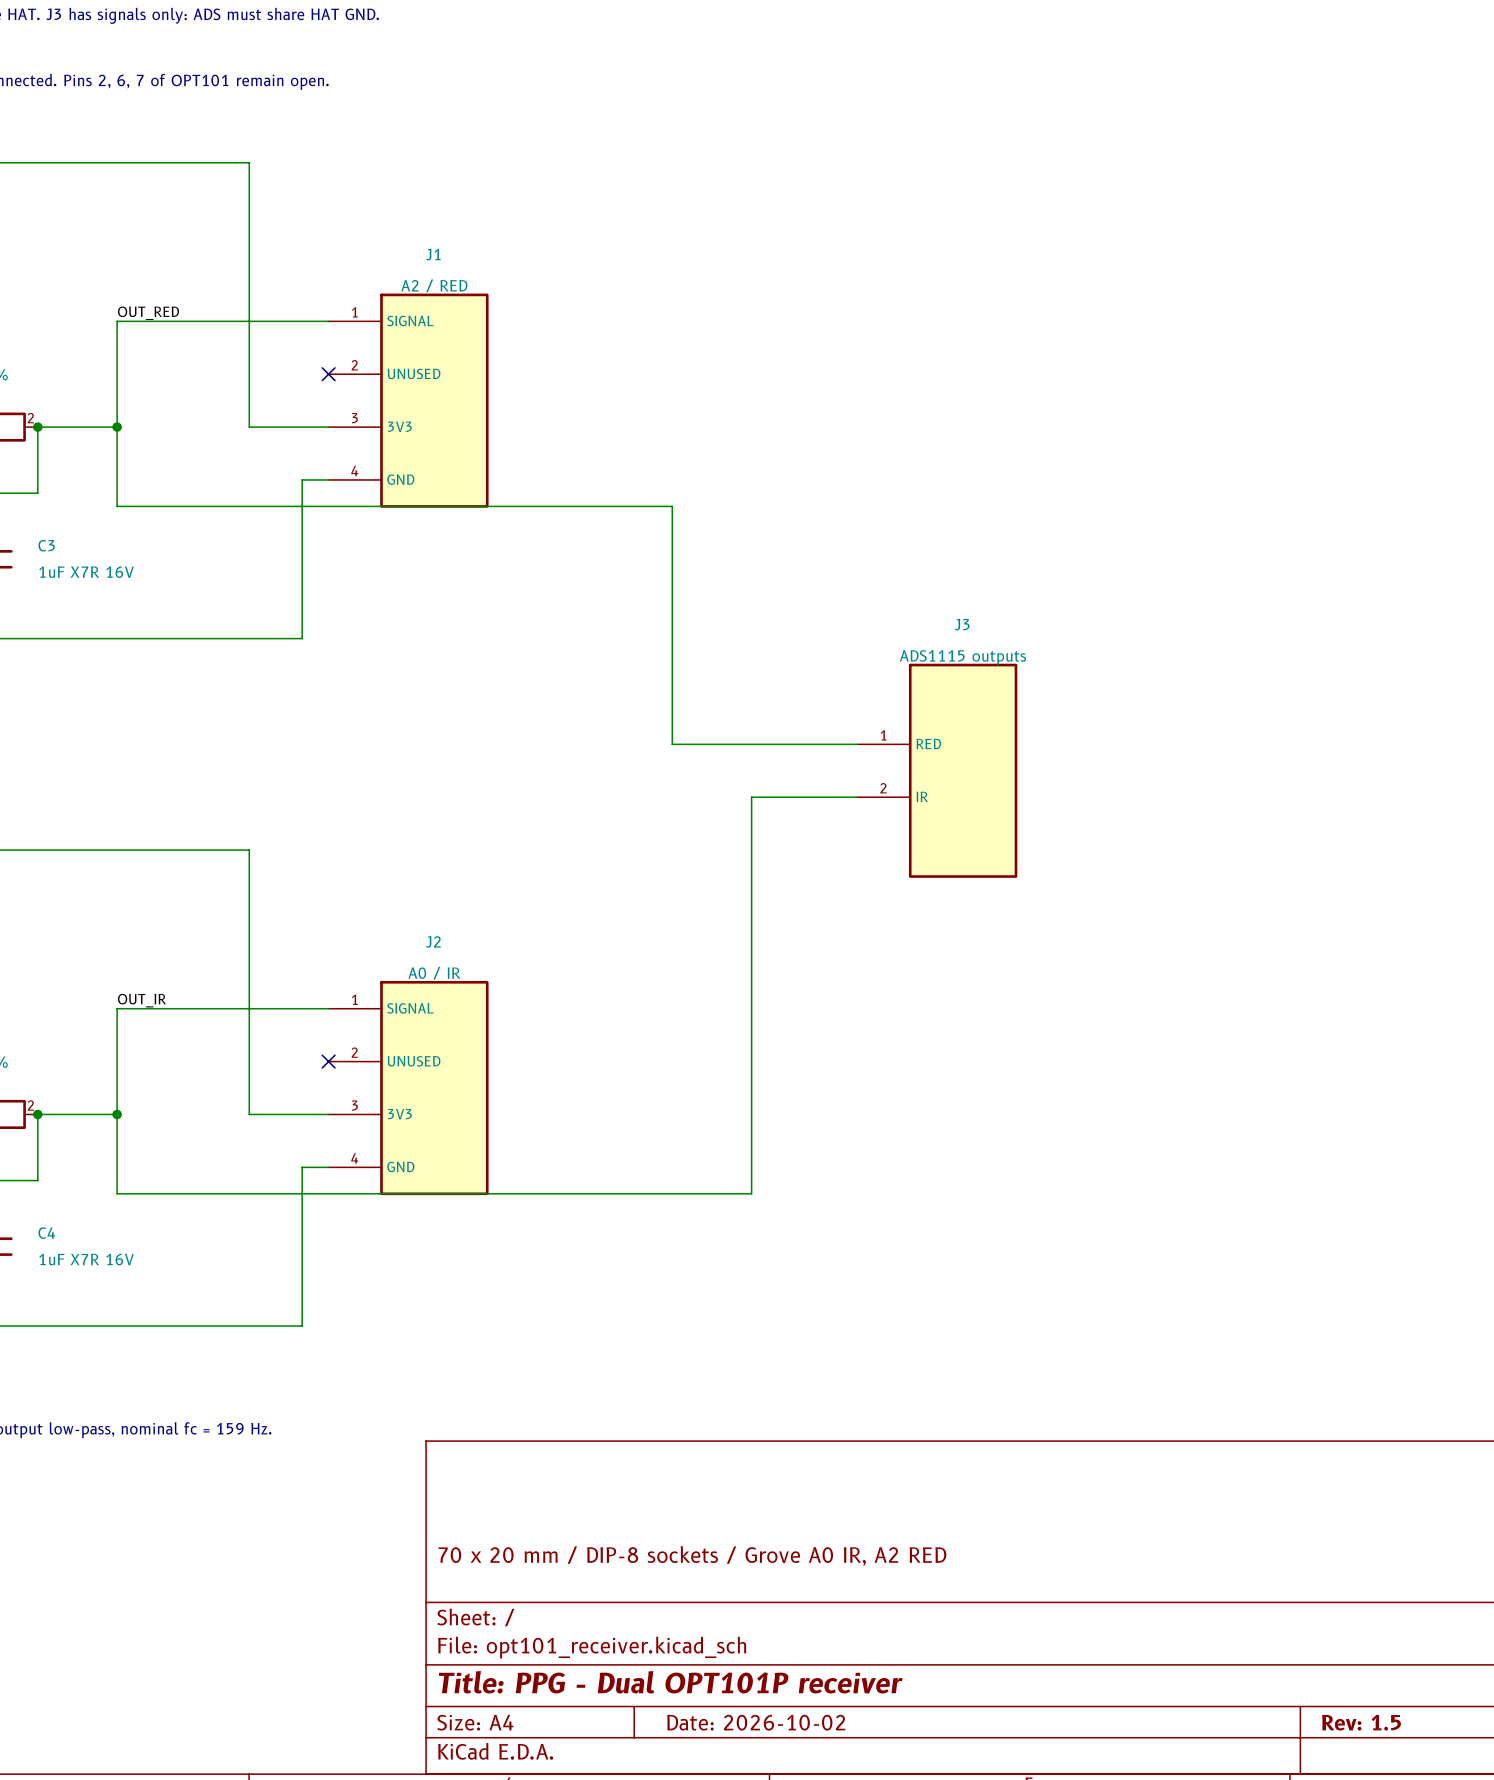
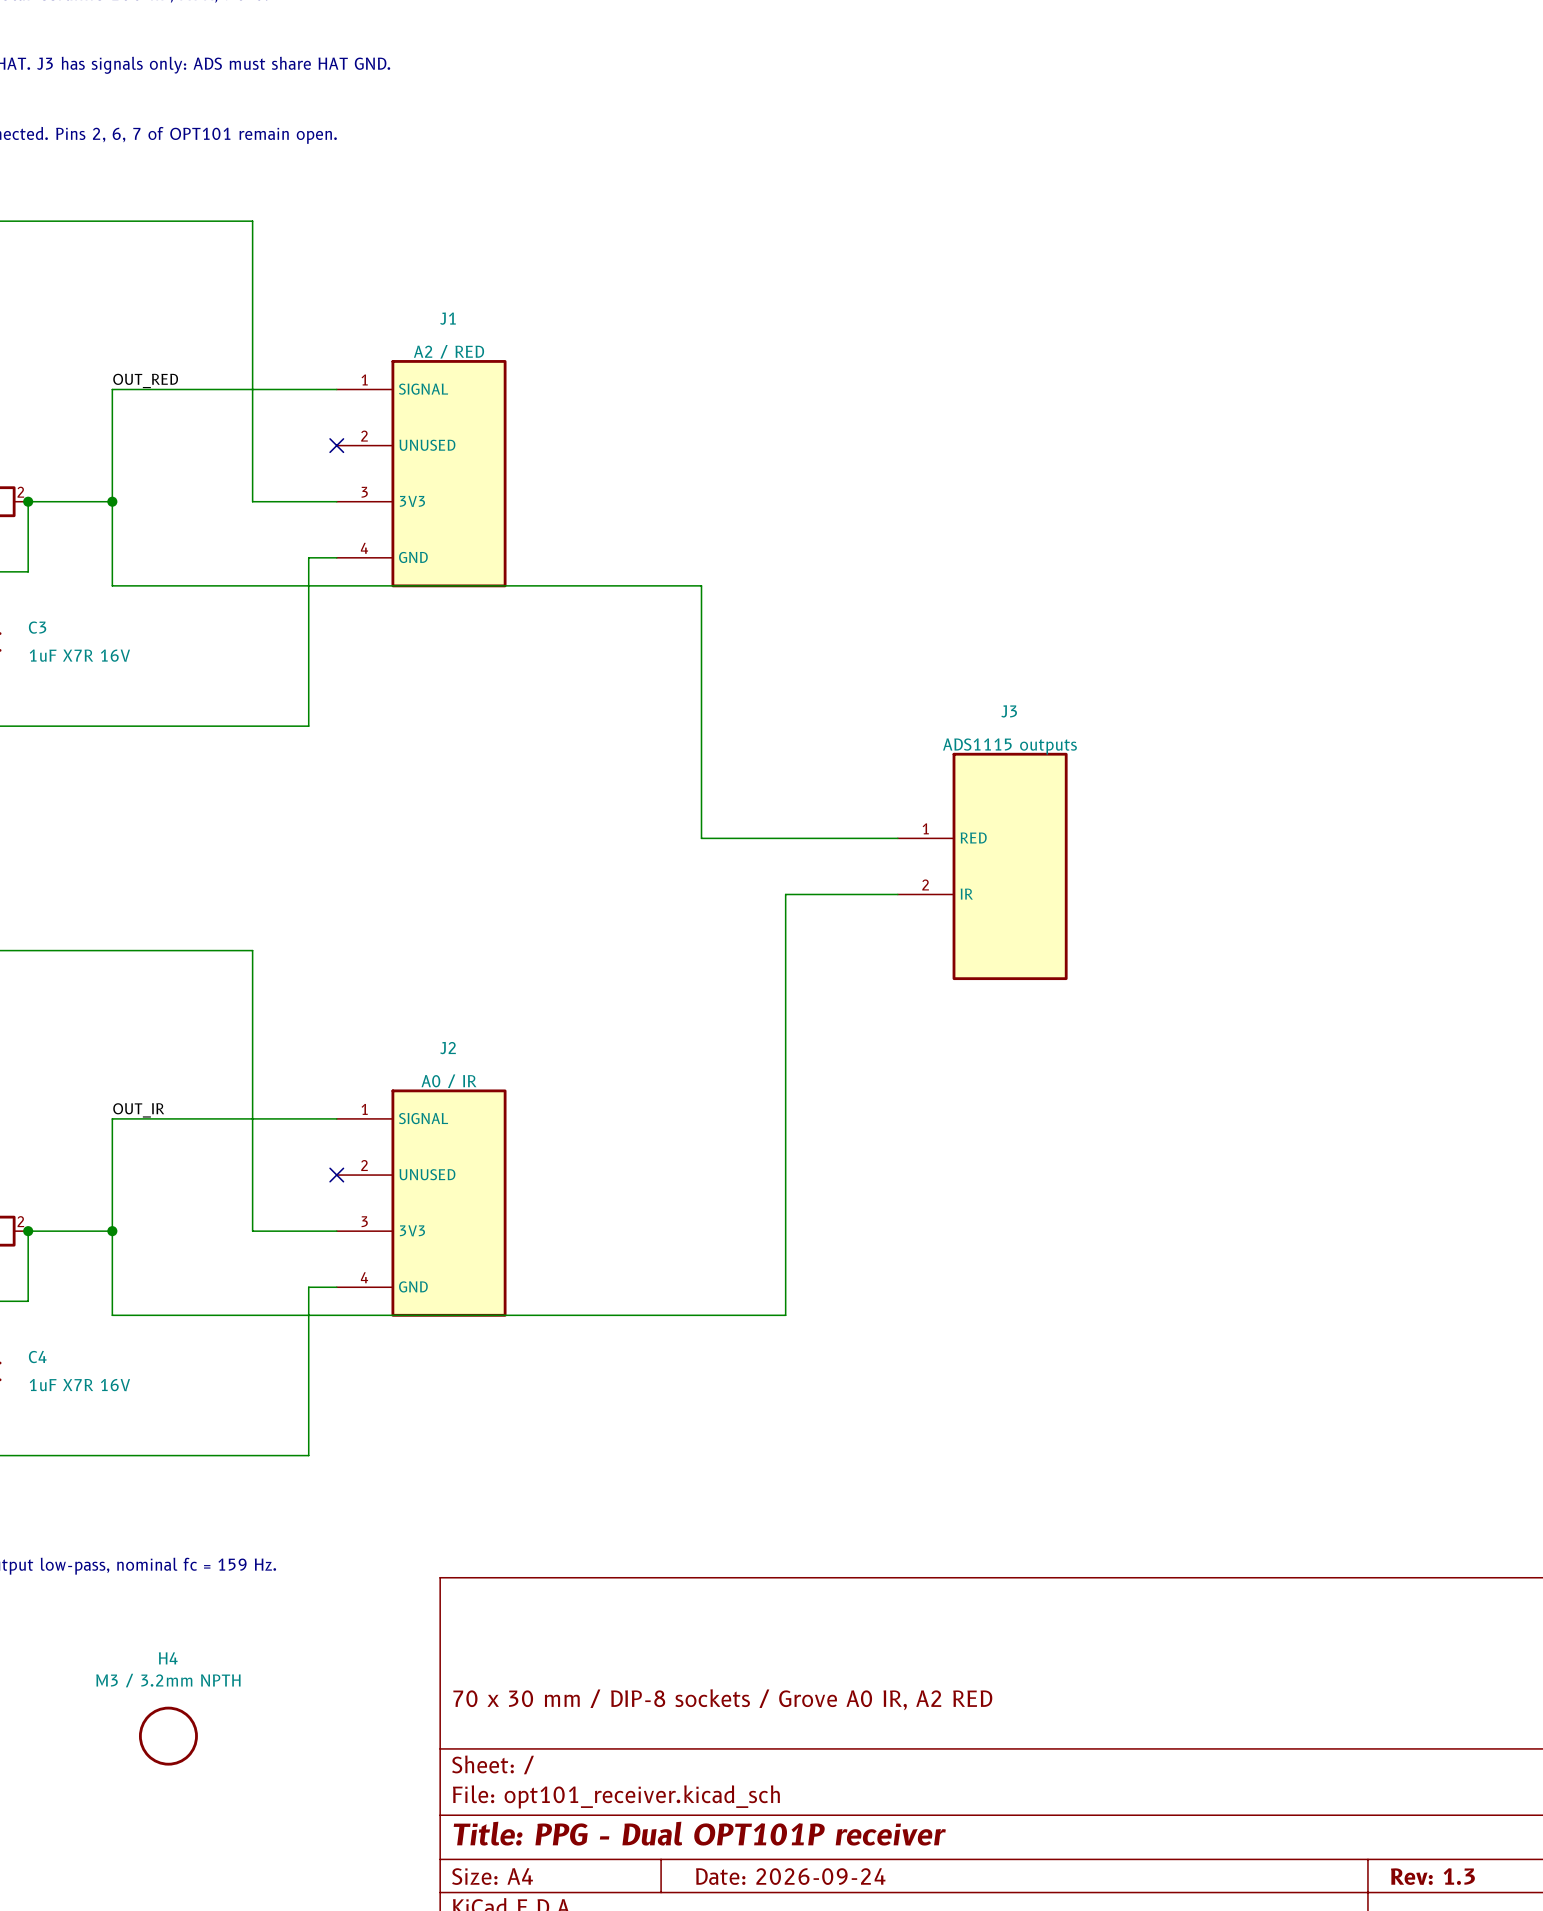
title block: 70 x 20 mm / DIP-8 sockets / Grove A0 IR, A2 RED (692, 1556) -> 70 x 30 mm / DIP-8 sockets / Grove A0 IR, A2 RED (722, 1699)
H4: none -> M3 / 3.2mm NPTH (168, 1736)
title block: Date: 2026-10-02 (756, 1722) -> Date: 2026-09-24 (790, 1876)
title block: Rev: 1.5 (1361, 1722) -> Rev: 1.3 (1432, 1876)

